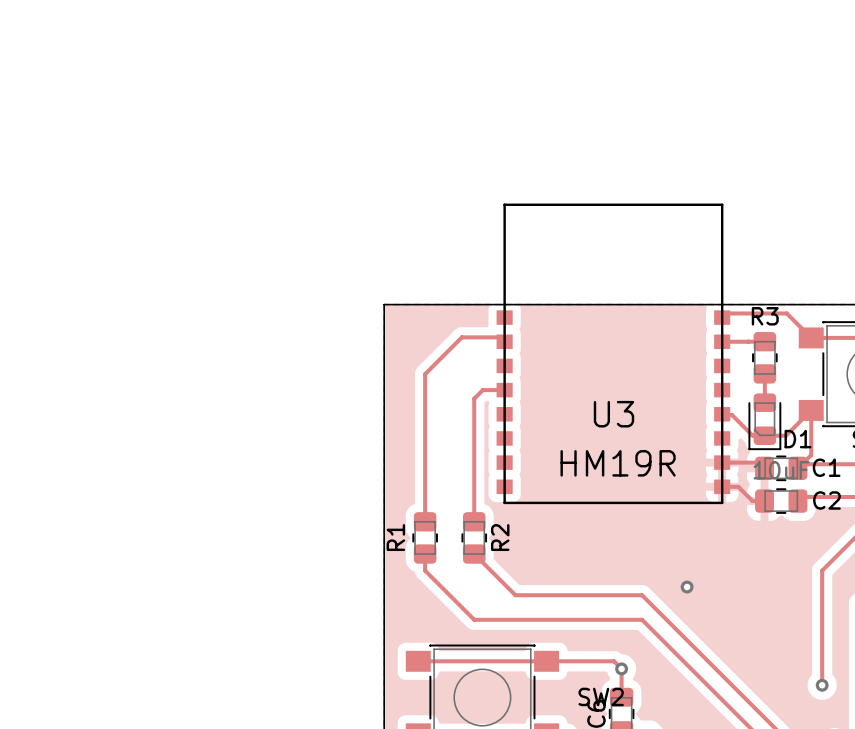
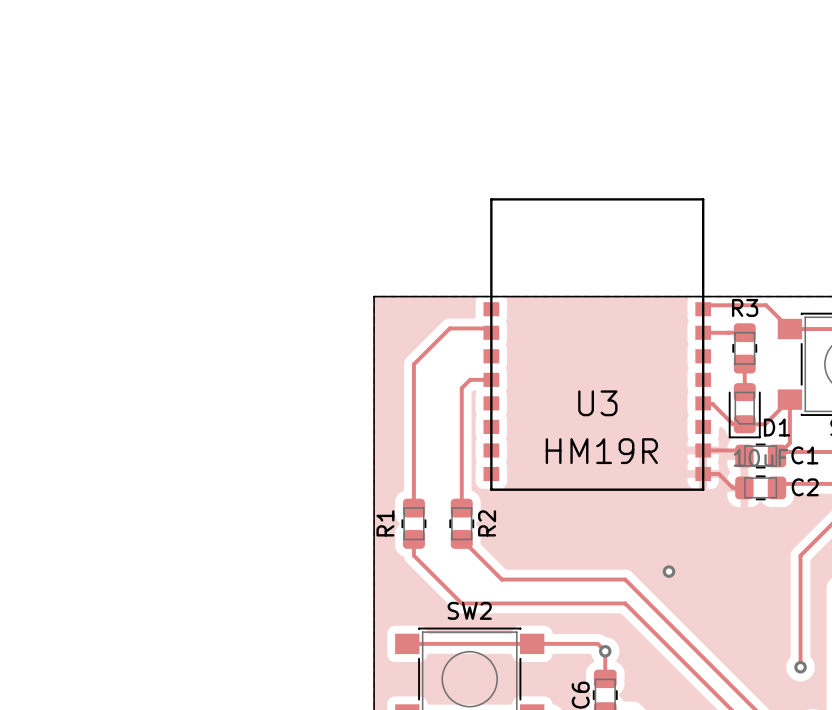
SW2 name position: SW2 (601, 696) -> SW2 (469, 610)

